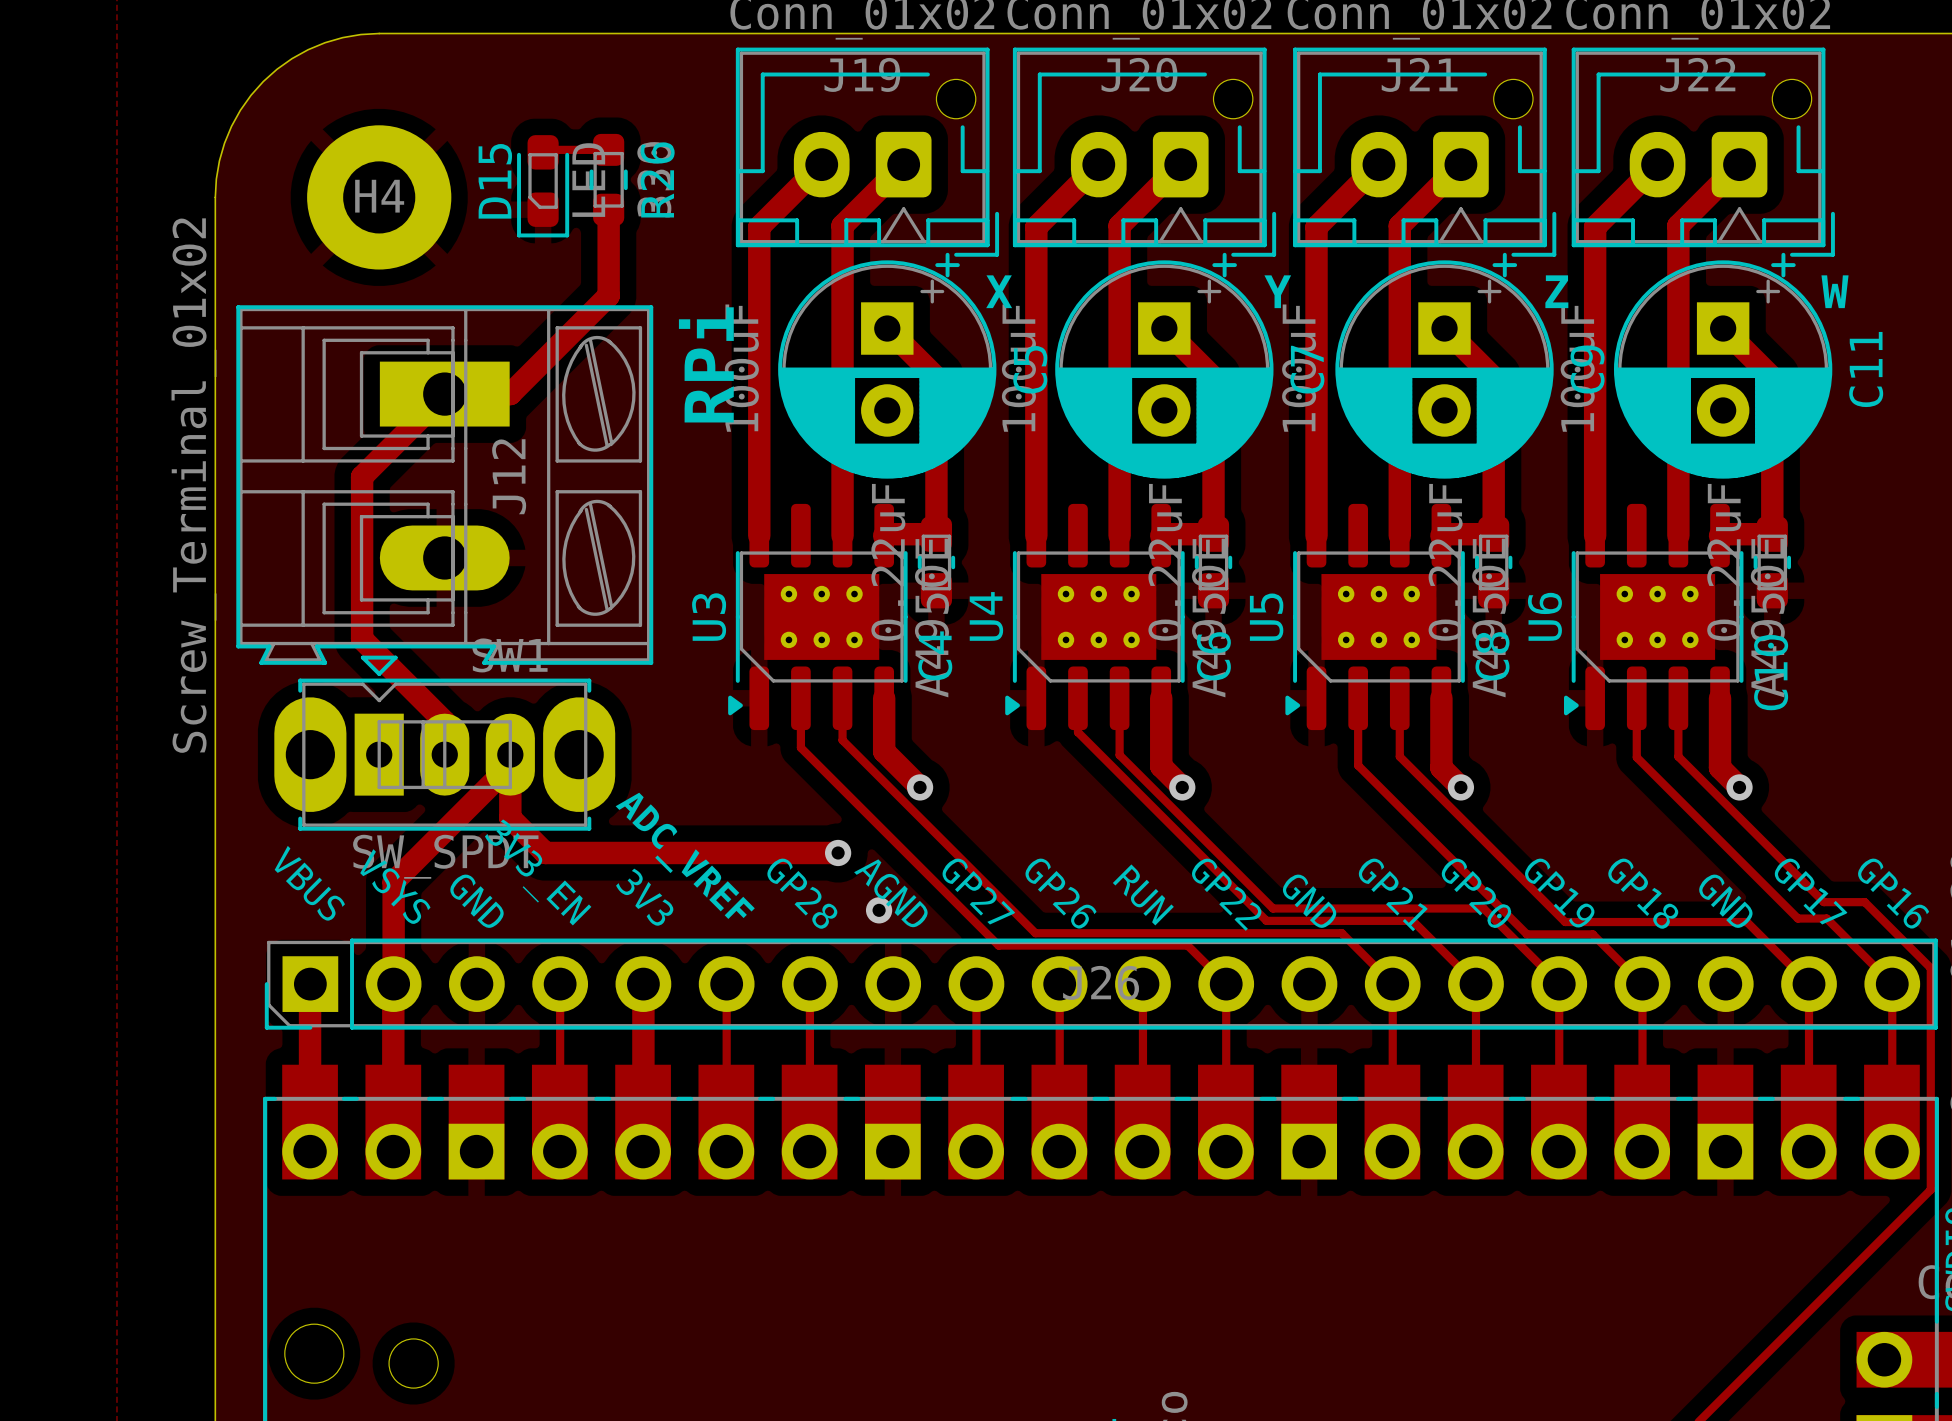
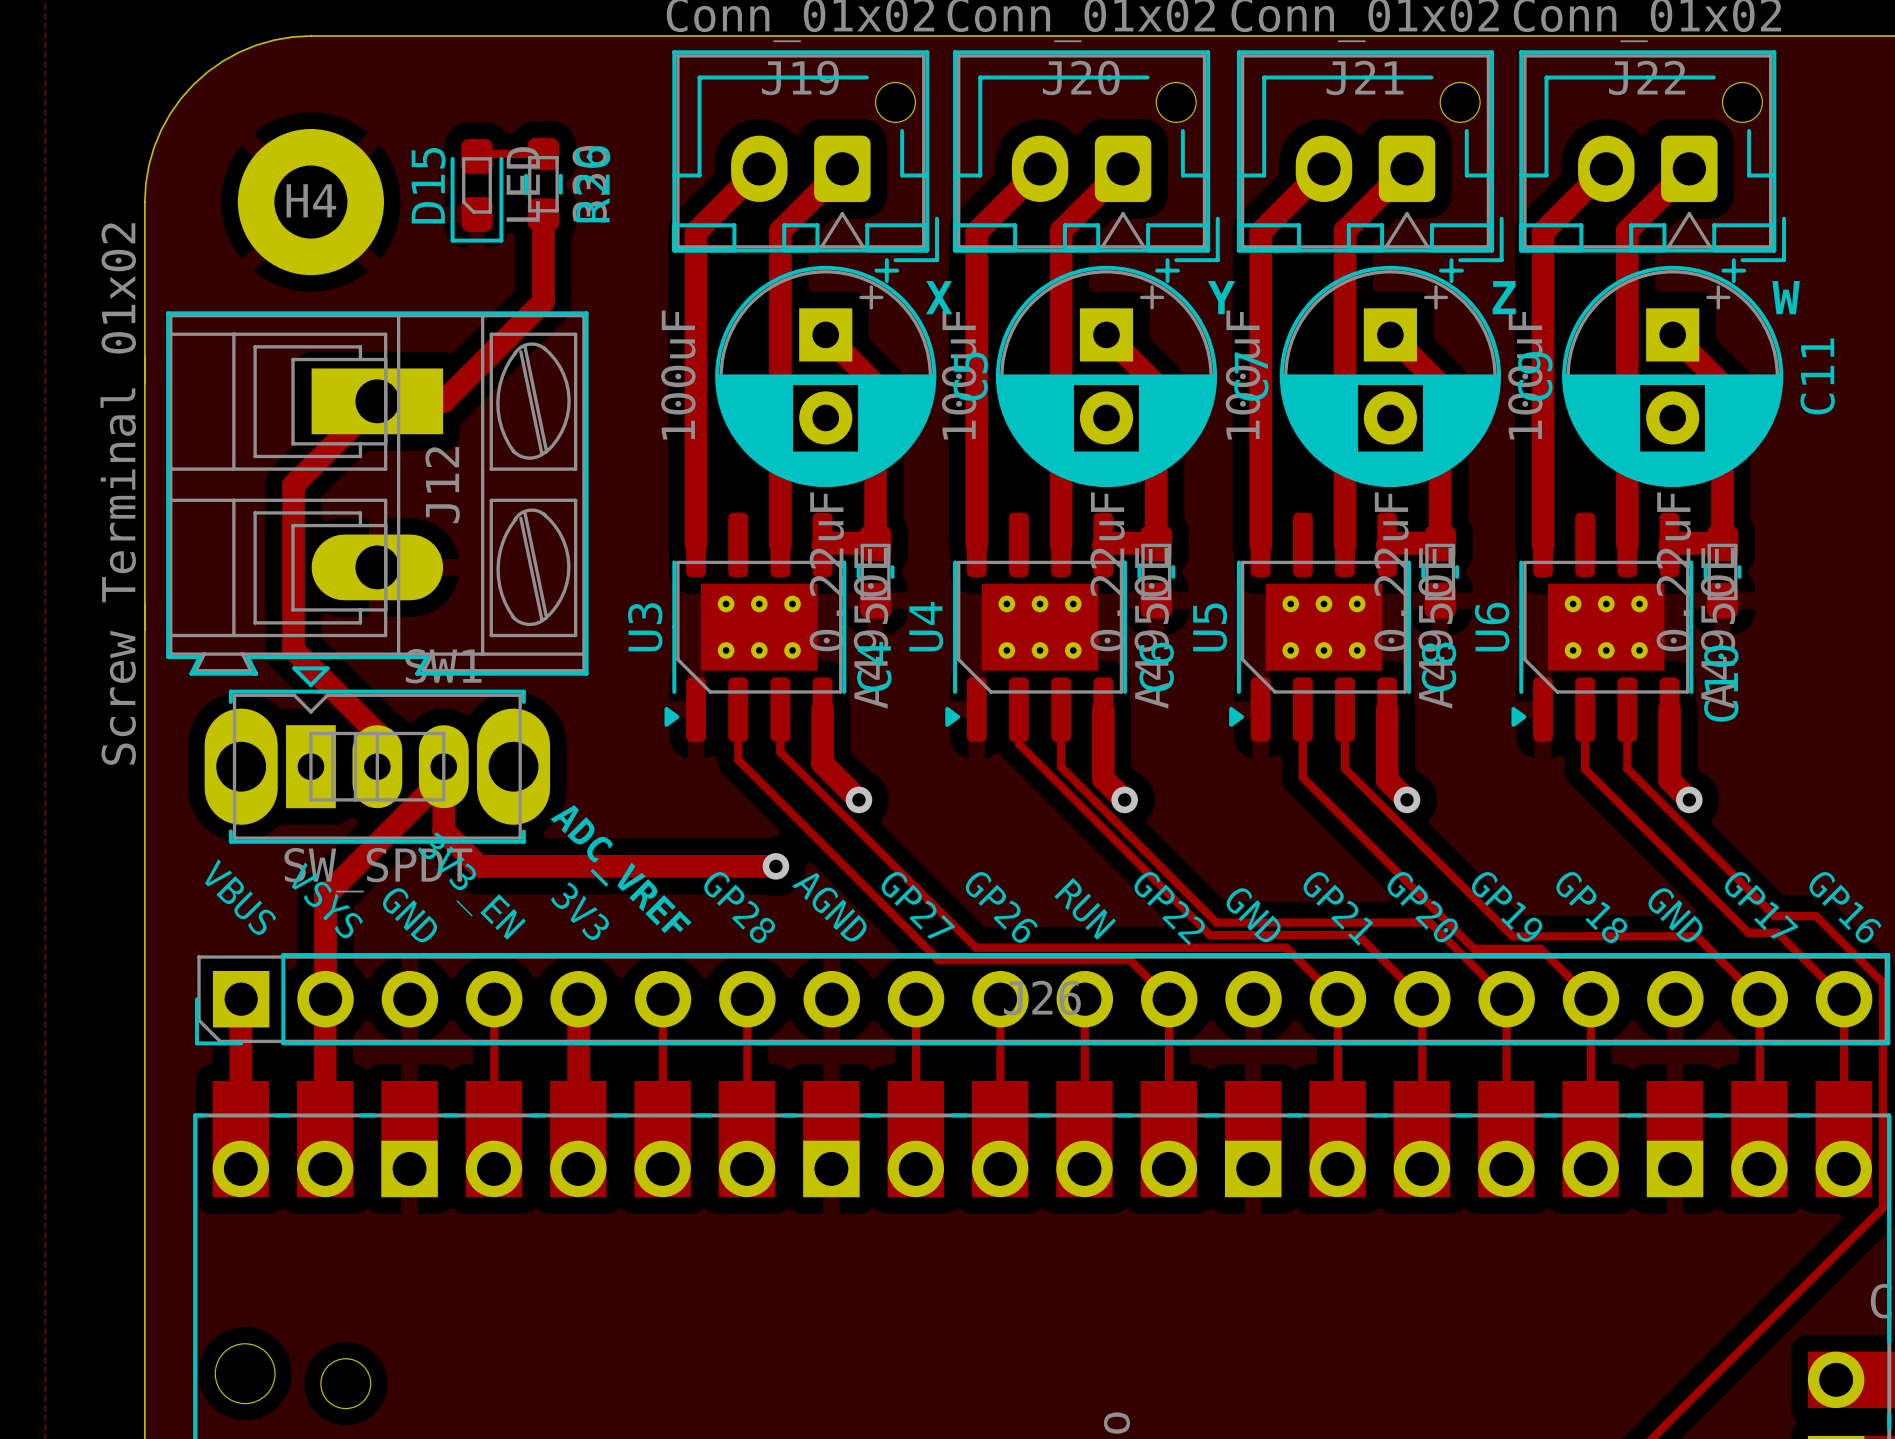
text: RPi (706, 364) -> none
via: (879, 910) -> none

